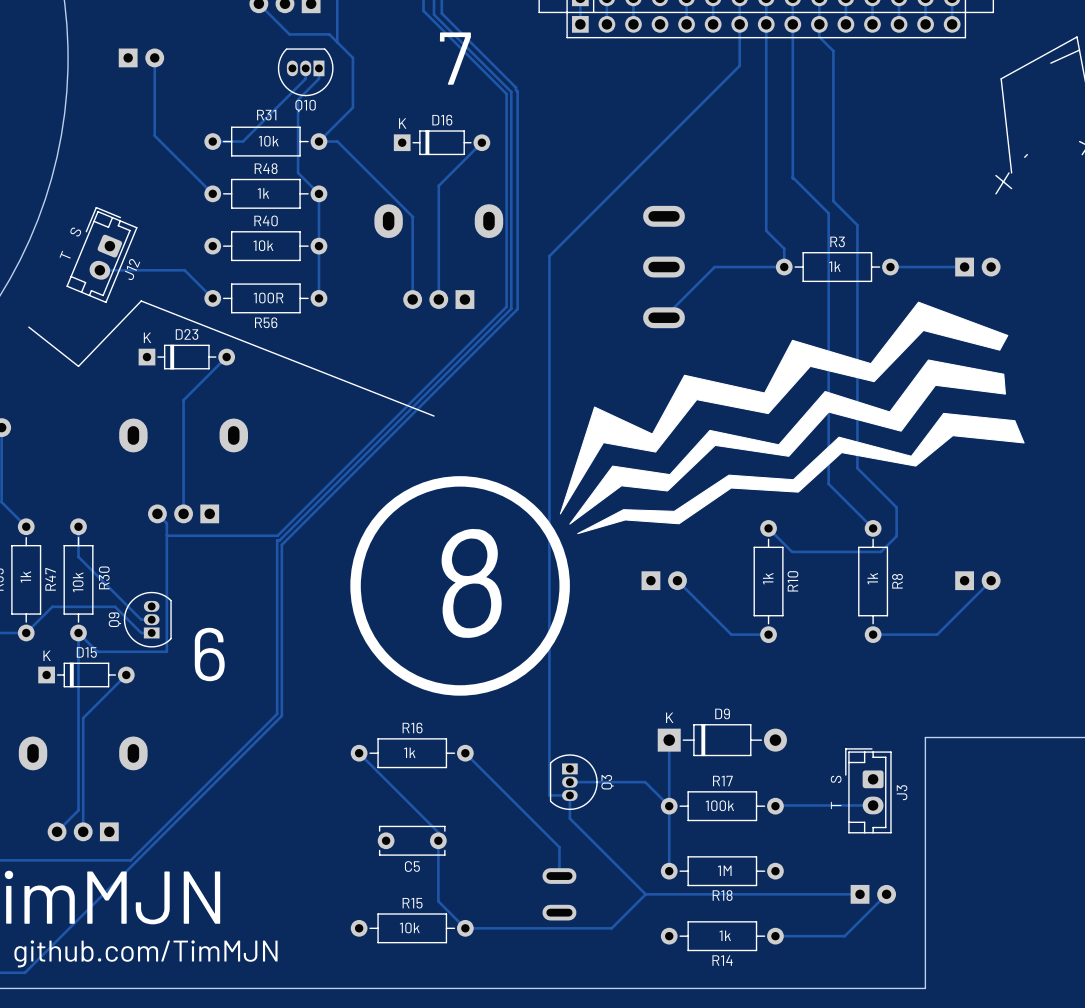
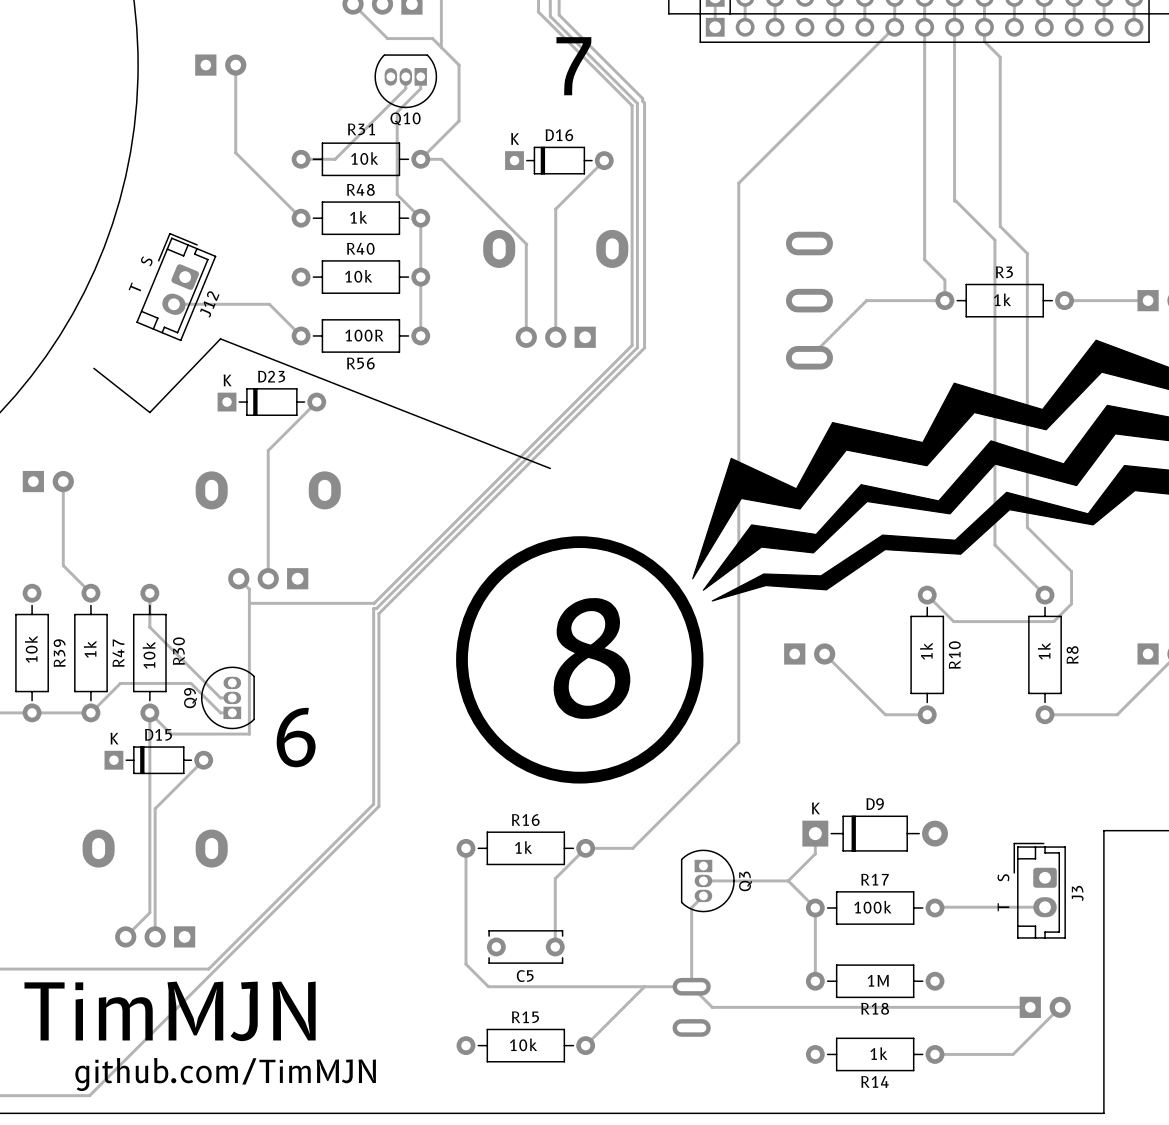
track: (739, 24) (739, 65) (549, 256) (549, 795) (569, 795) (569, 818) (645, 894) (611, 928) (465, 928) (438, 901) (438, 840) -> (894, 27) (738, 183) (738, 742) (632, 848) (585, 848) (555, 878) (555, 937)
track: (359, 753) (438, 832) -> (465, 848) (465, 964) (488, 986) (691, 986) (712, 1007) (788, 1007)
track: (465, 753) (559, 847) -> (703, 895) (691, 907) (691, 954)
track: (669, 758) (669, 806) -> (815, 853) (788, 880)
track: none -> (644, 986) (585, 1045)

